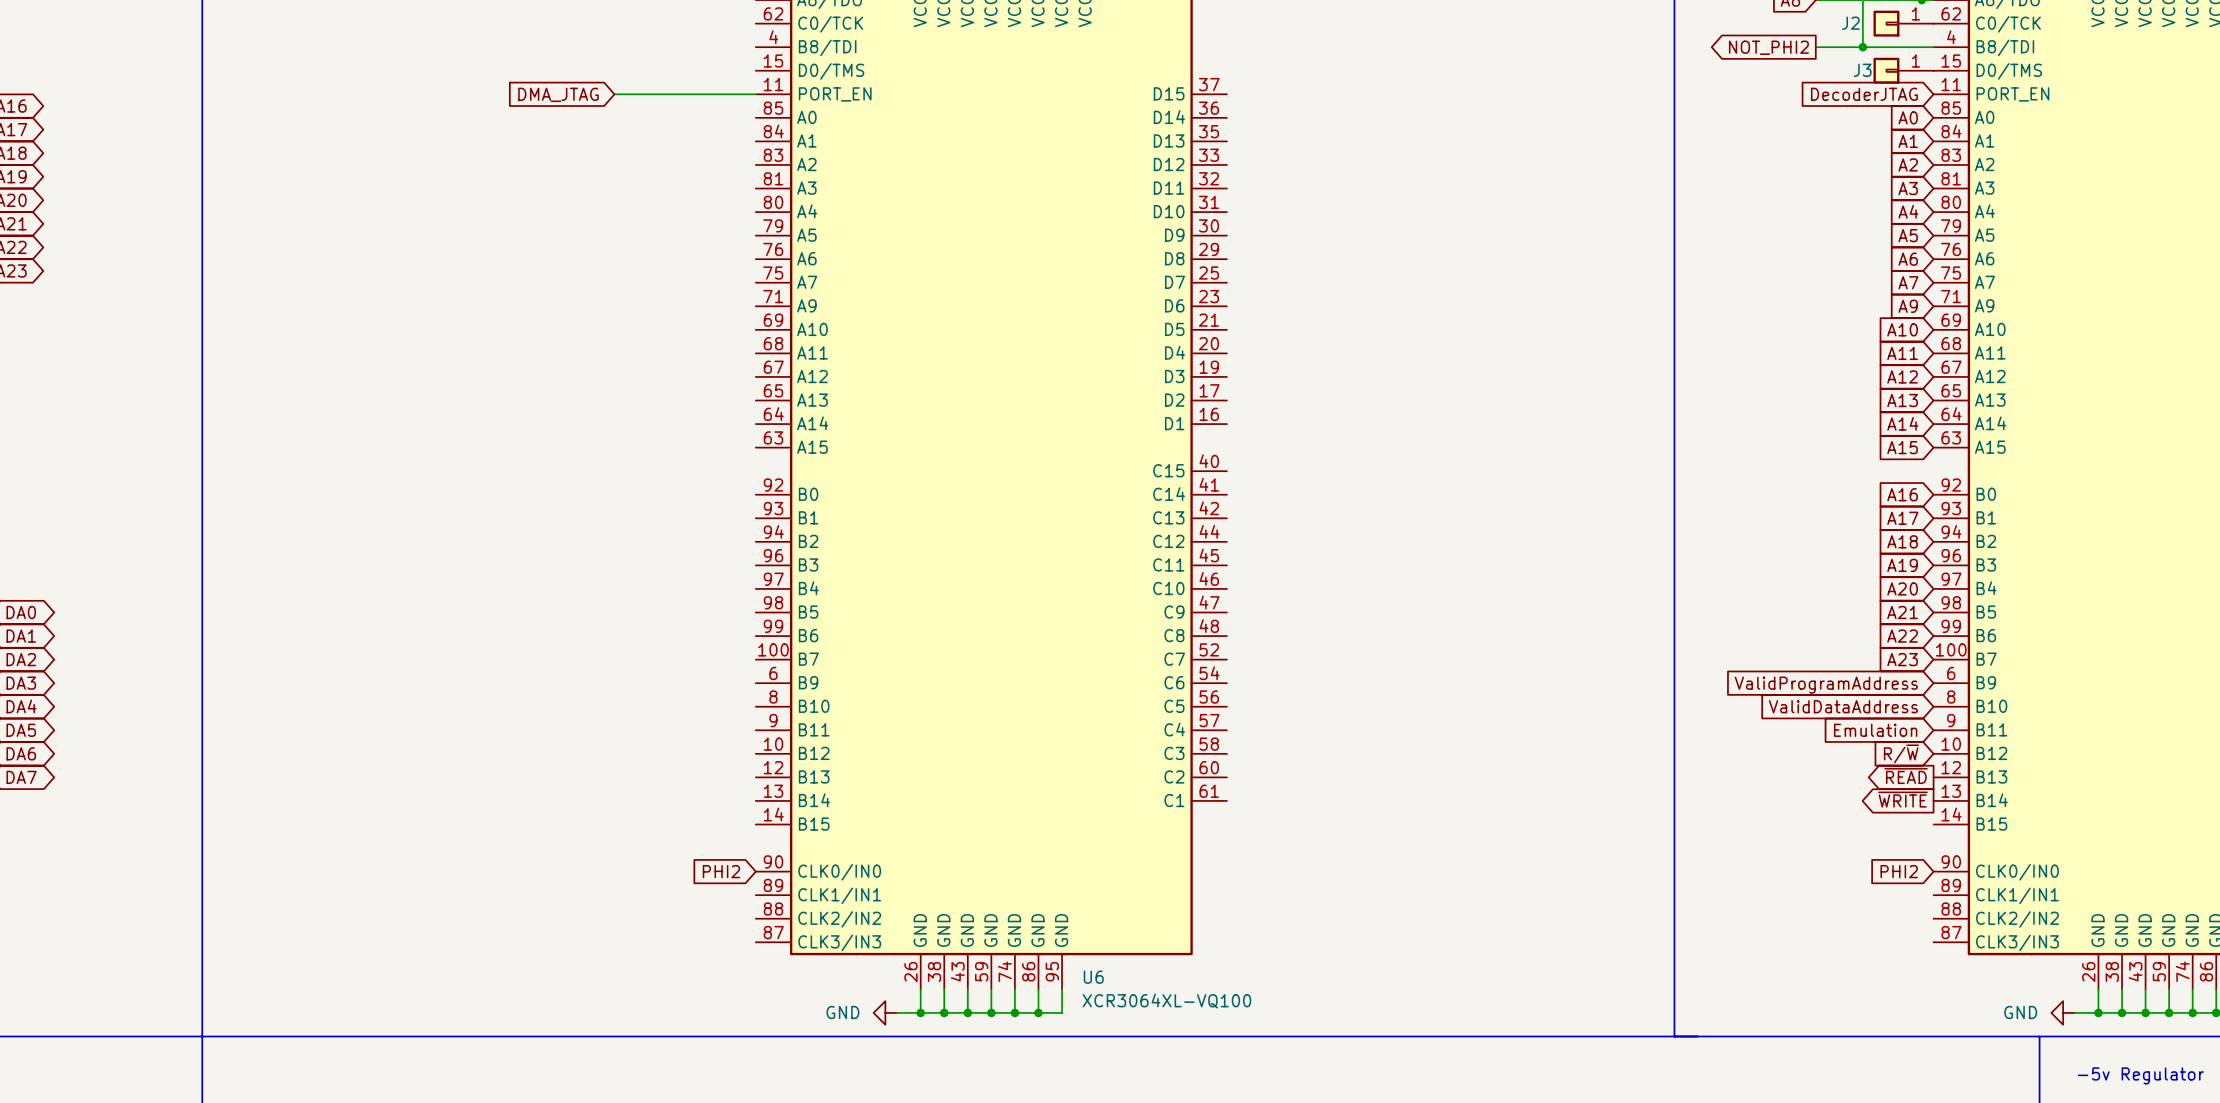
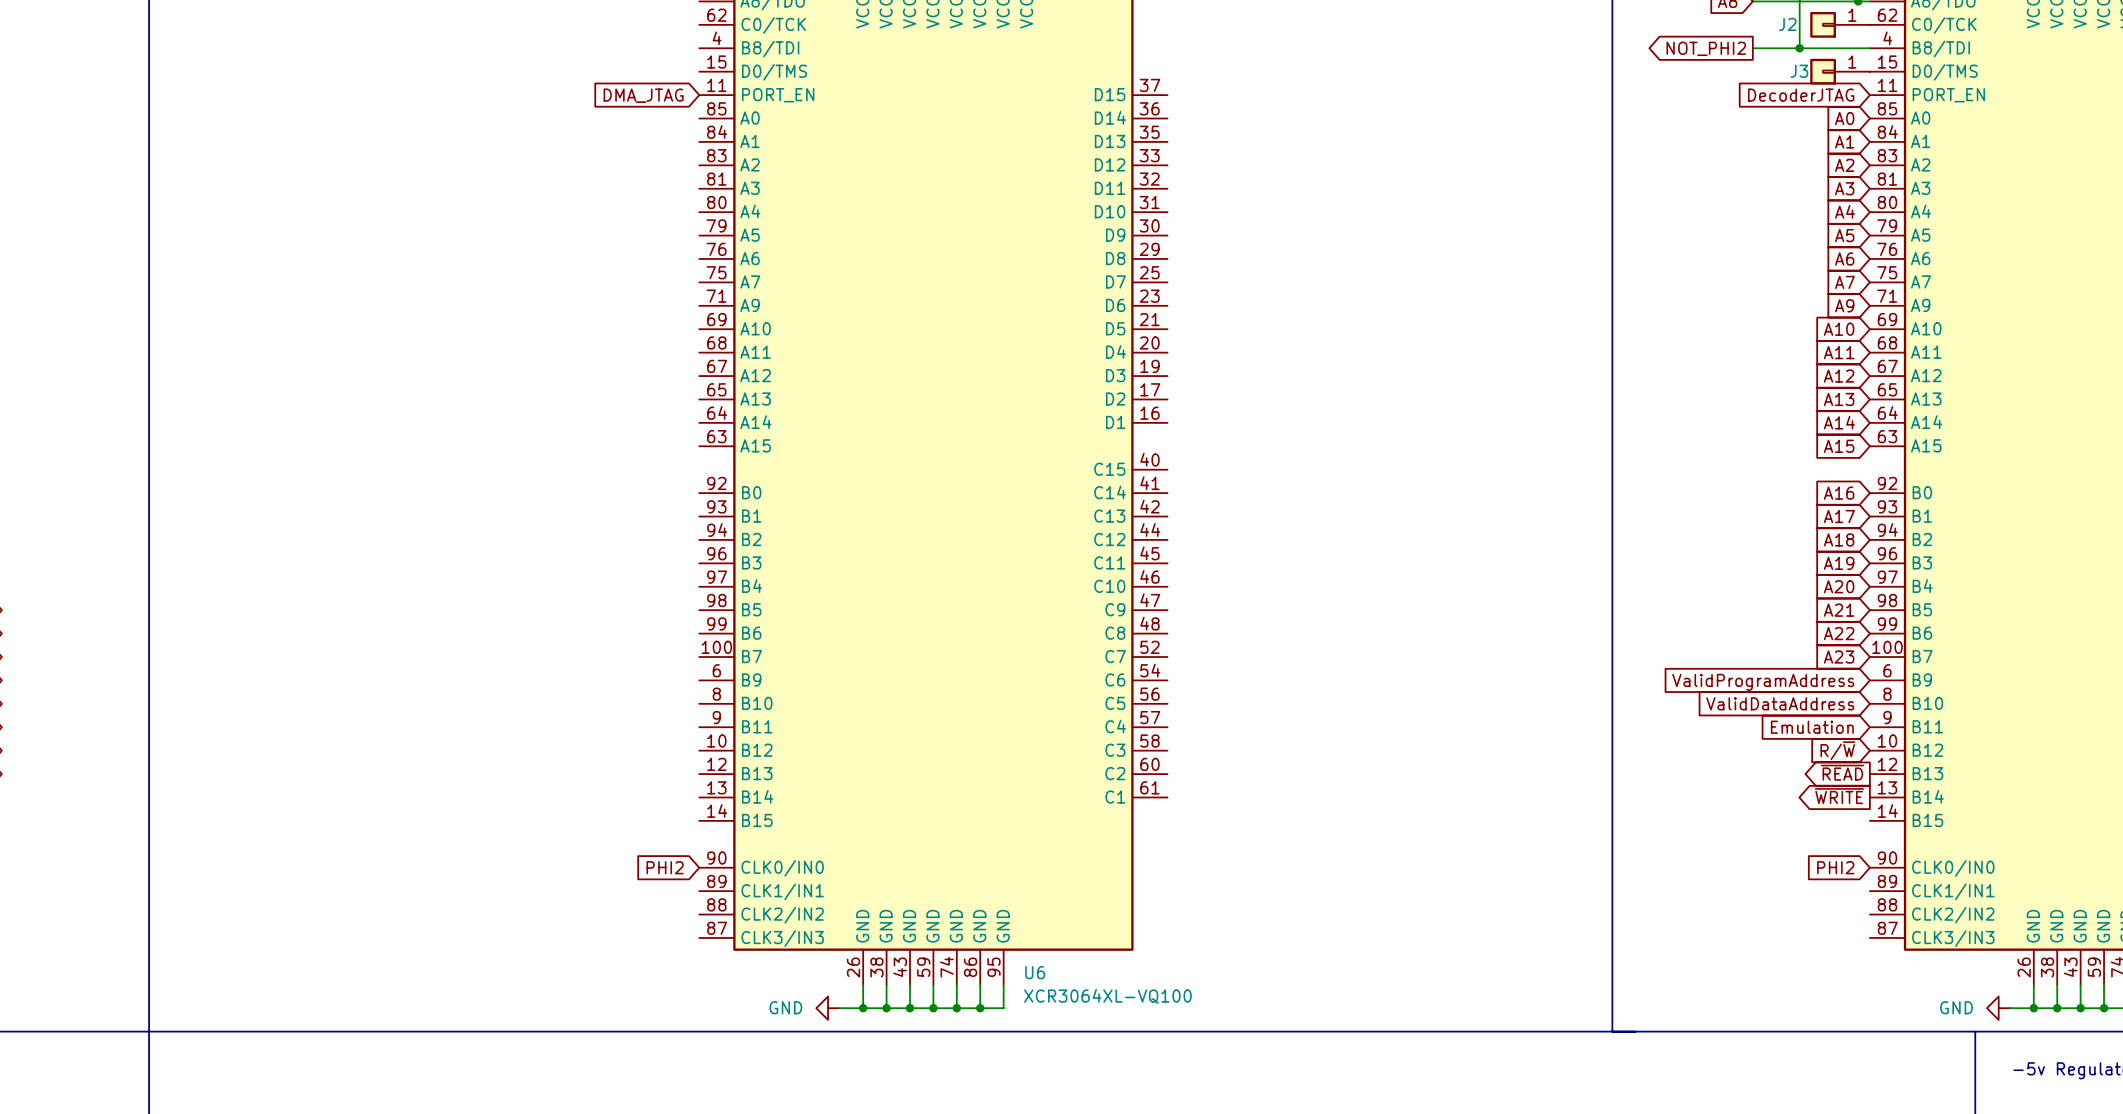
global label position: DMA_JTAG (558, 94) -> DMA_JTAG (643, 95)
wire: (614, 94) (755, 94) -> none

